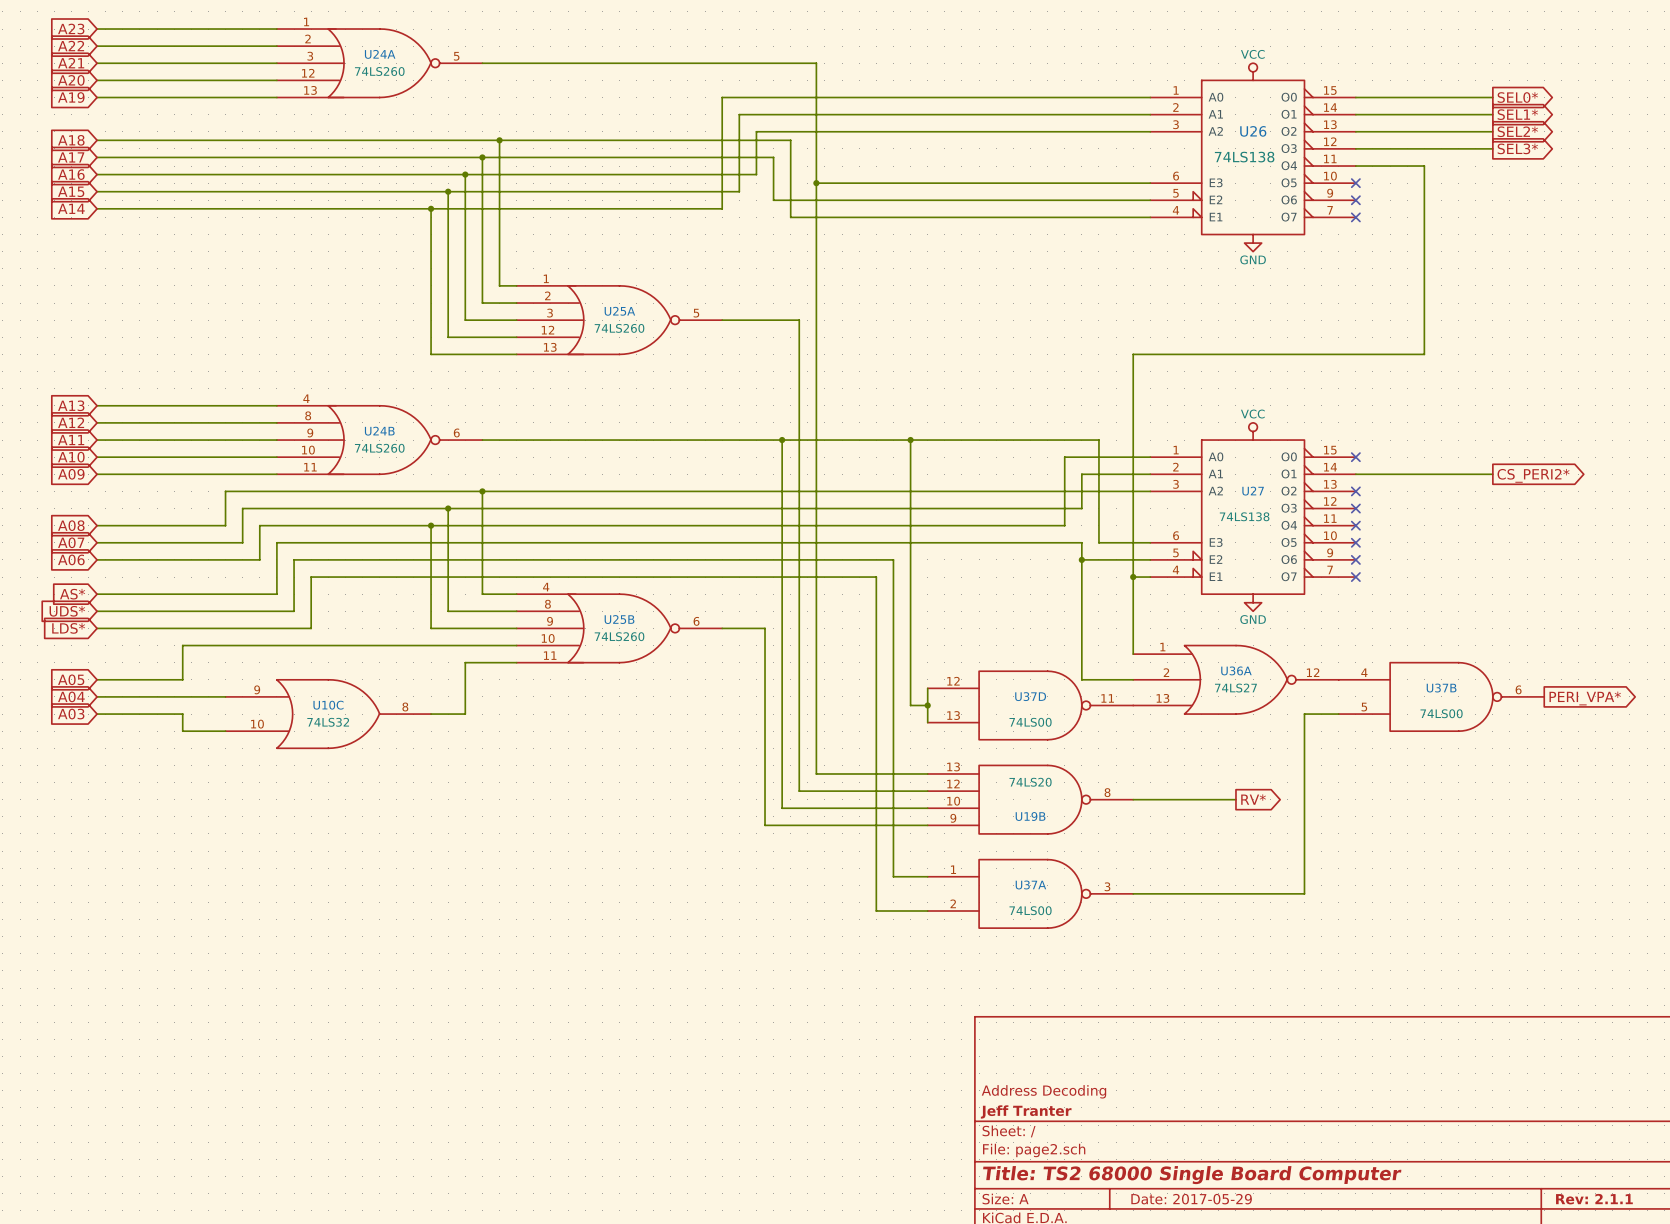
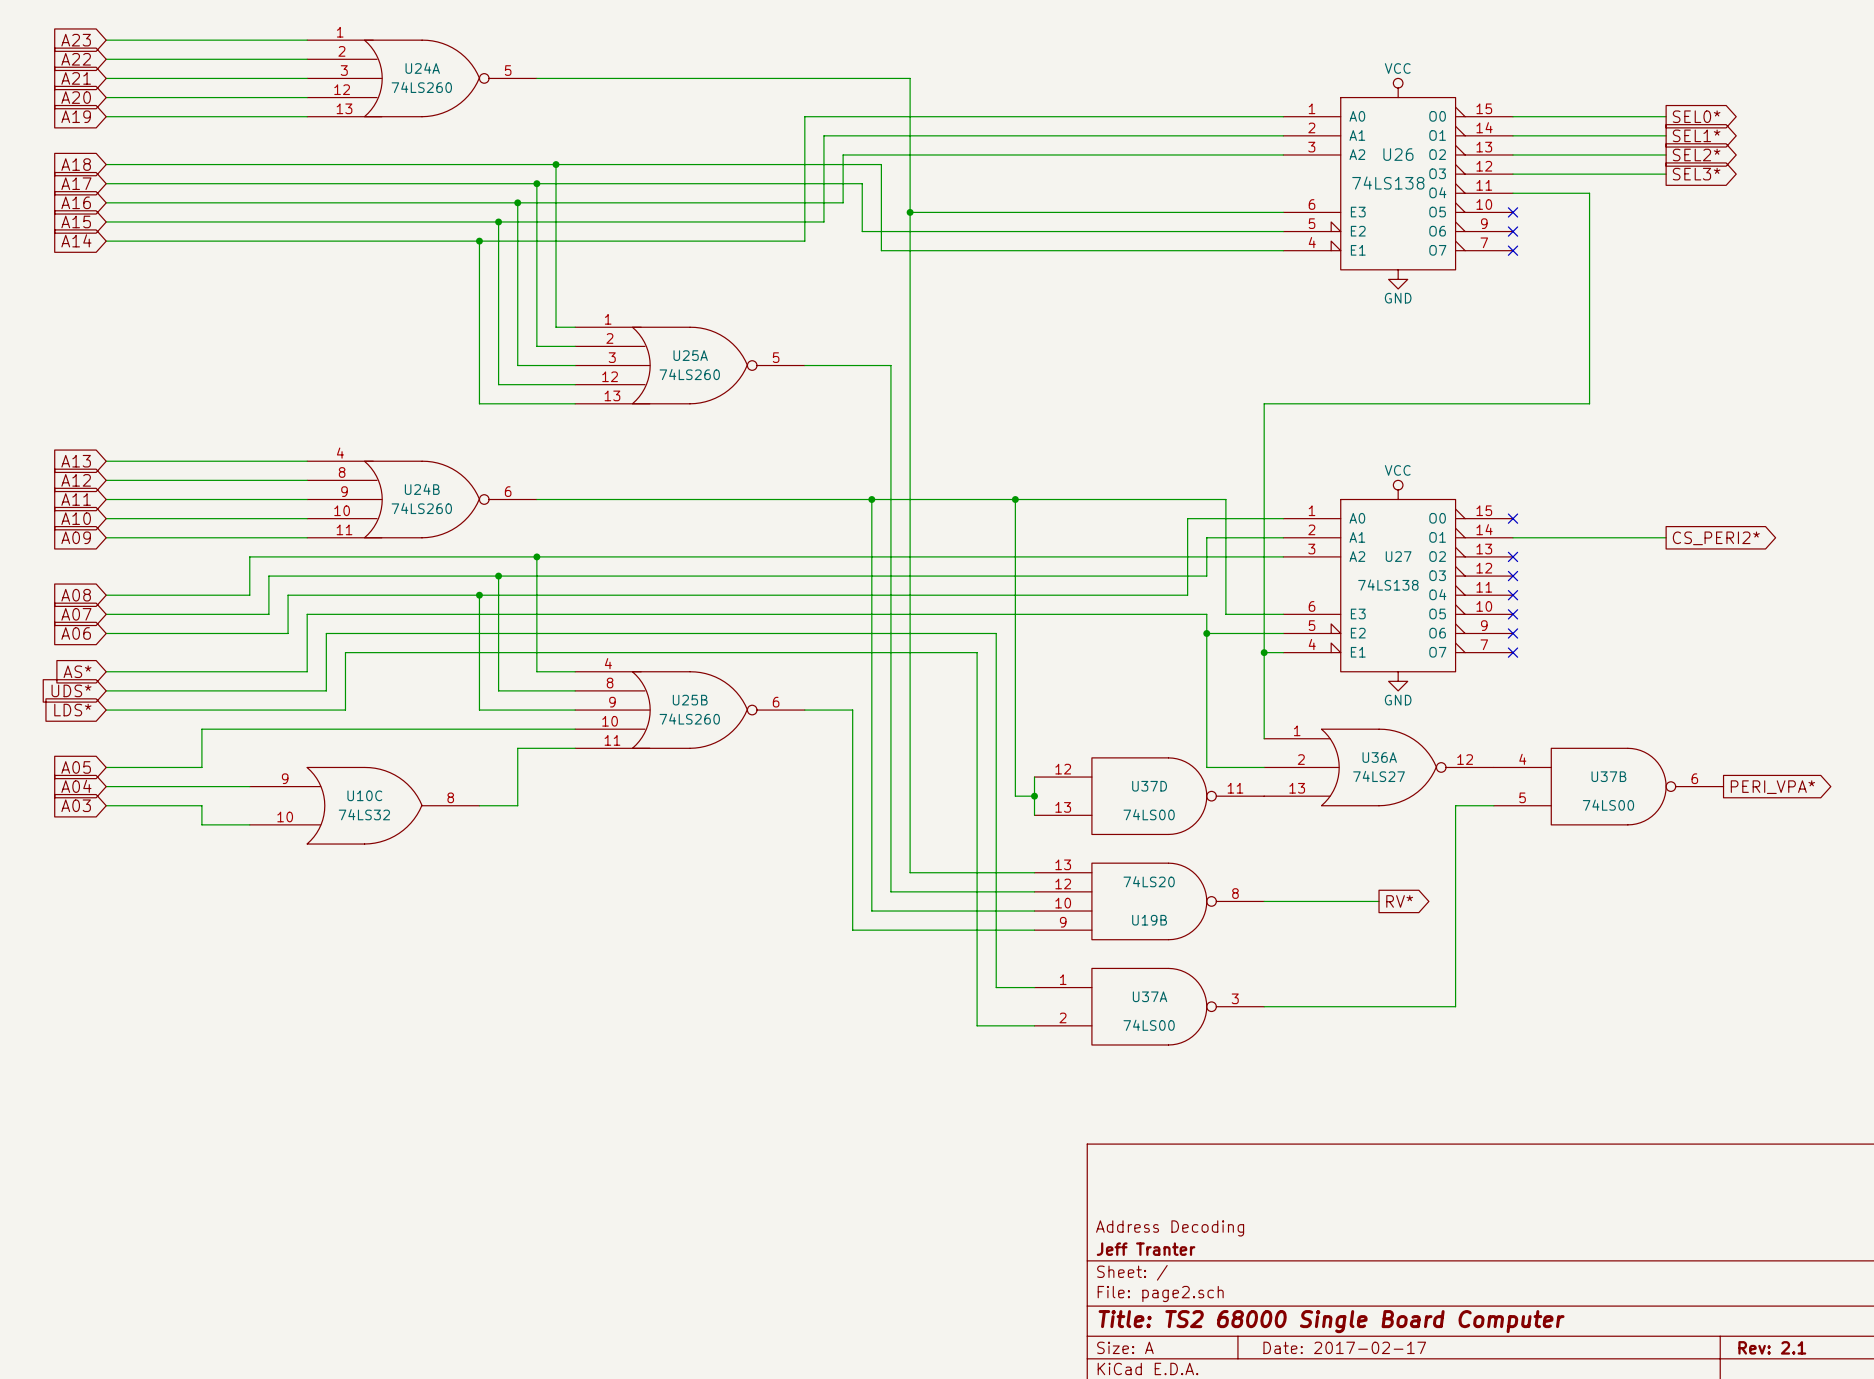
title block: Date: 2017-05-29 (1191, 1199) -> Date: 2017-02-17 (1344, 1347)
title block: Rev: 2.1.1 (1594, 1199) -> Rev: 2.1 (1772, 1347)

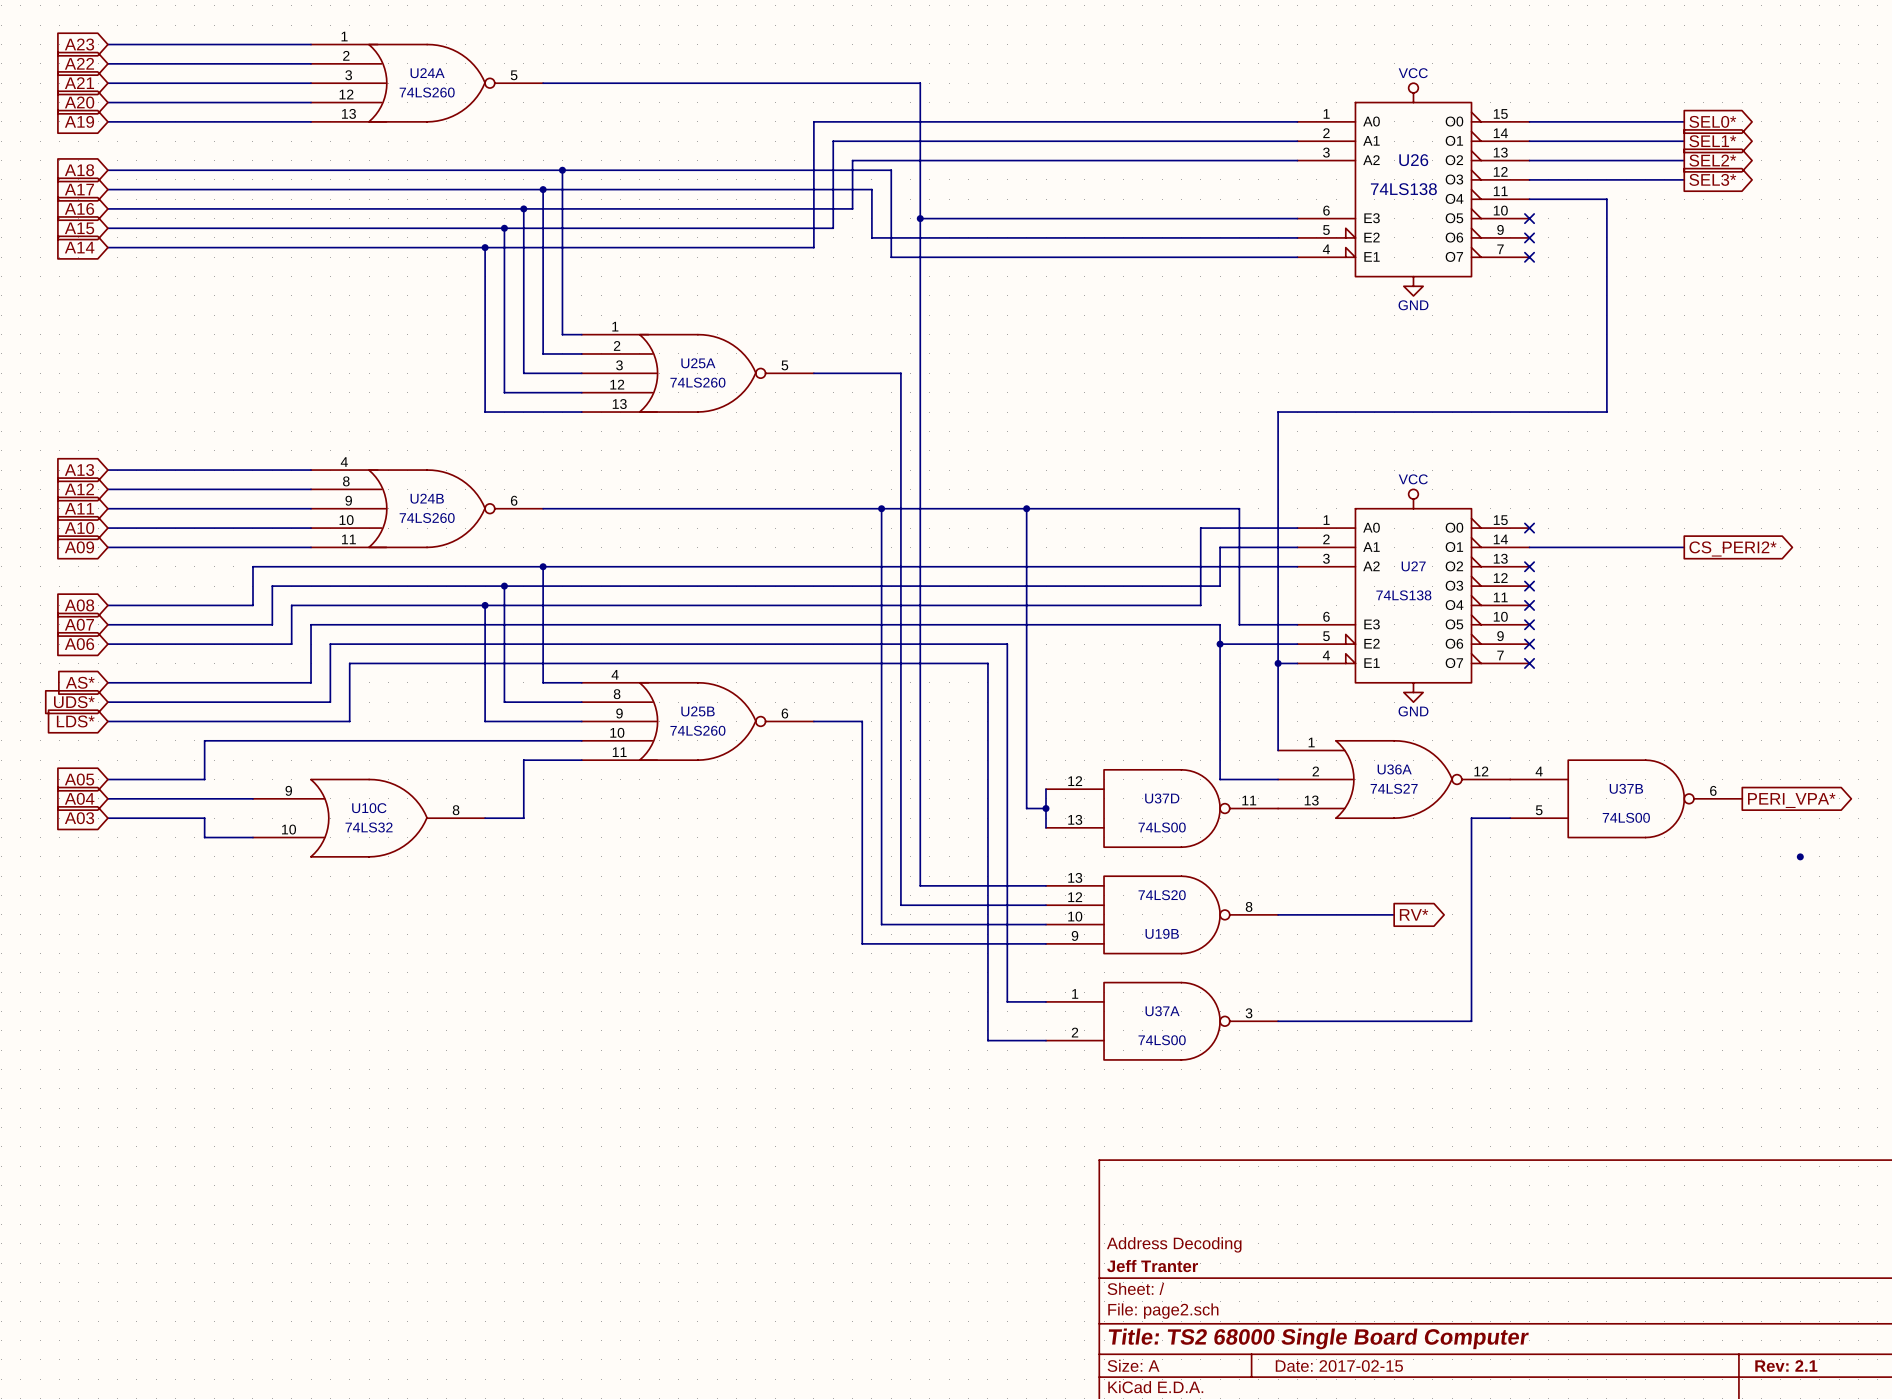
junction: none -> (1800, 856)
title block: Date: 2017-02-17 (1344, 1347) -> Date: 2017-02-15 (1339, 1366)

